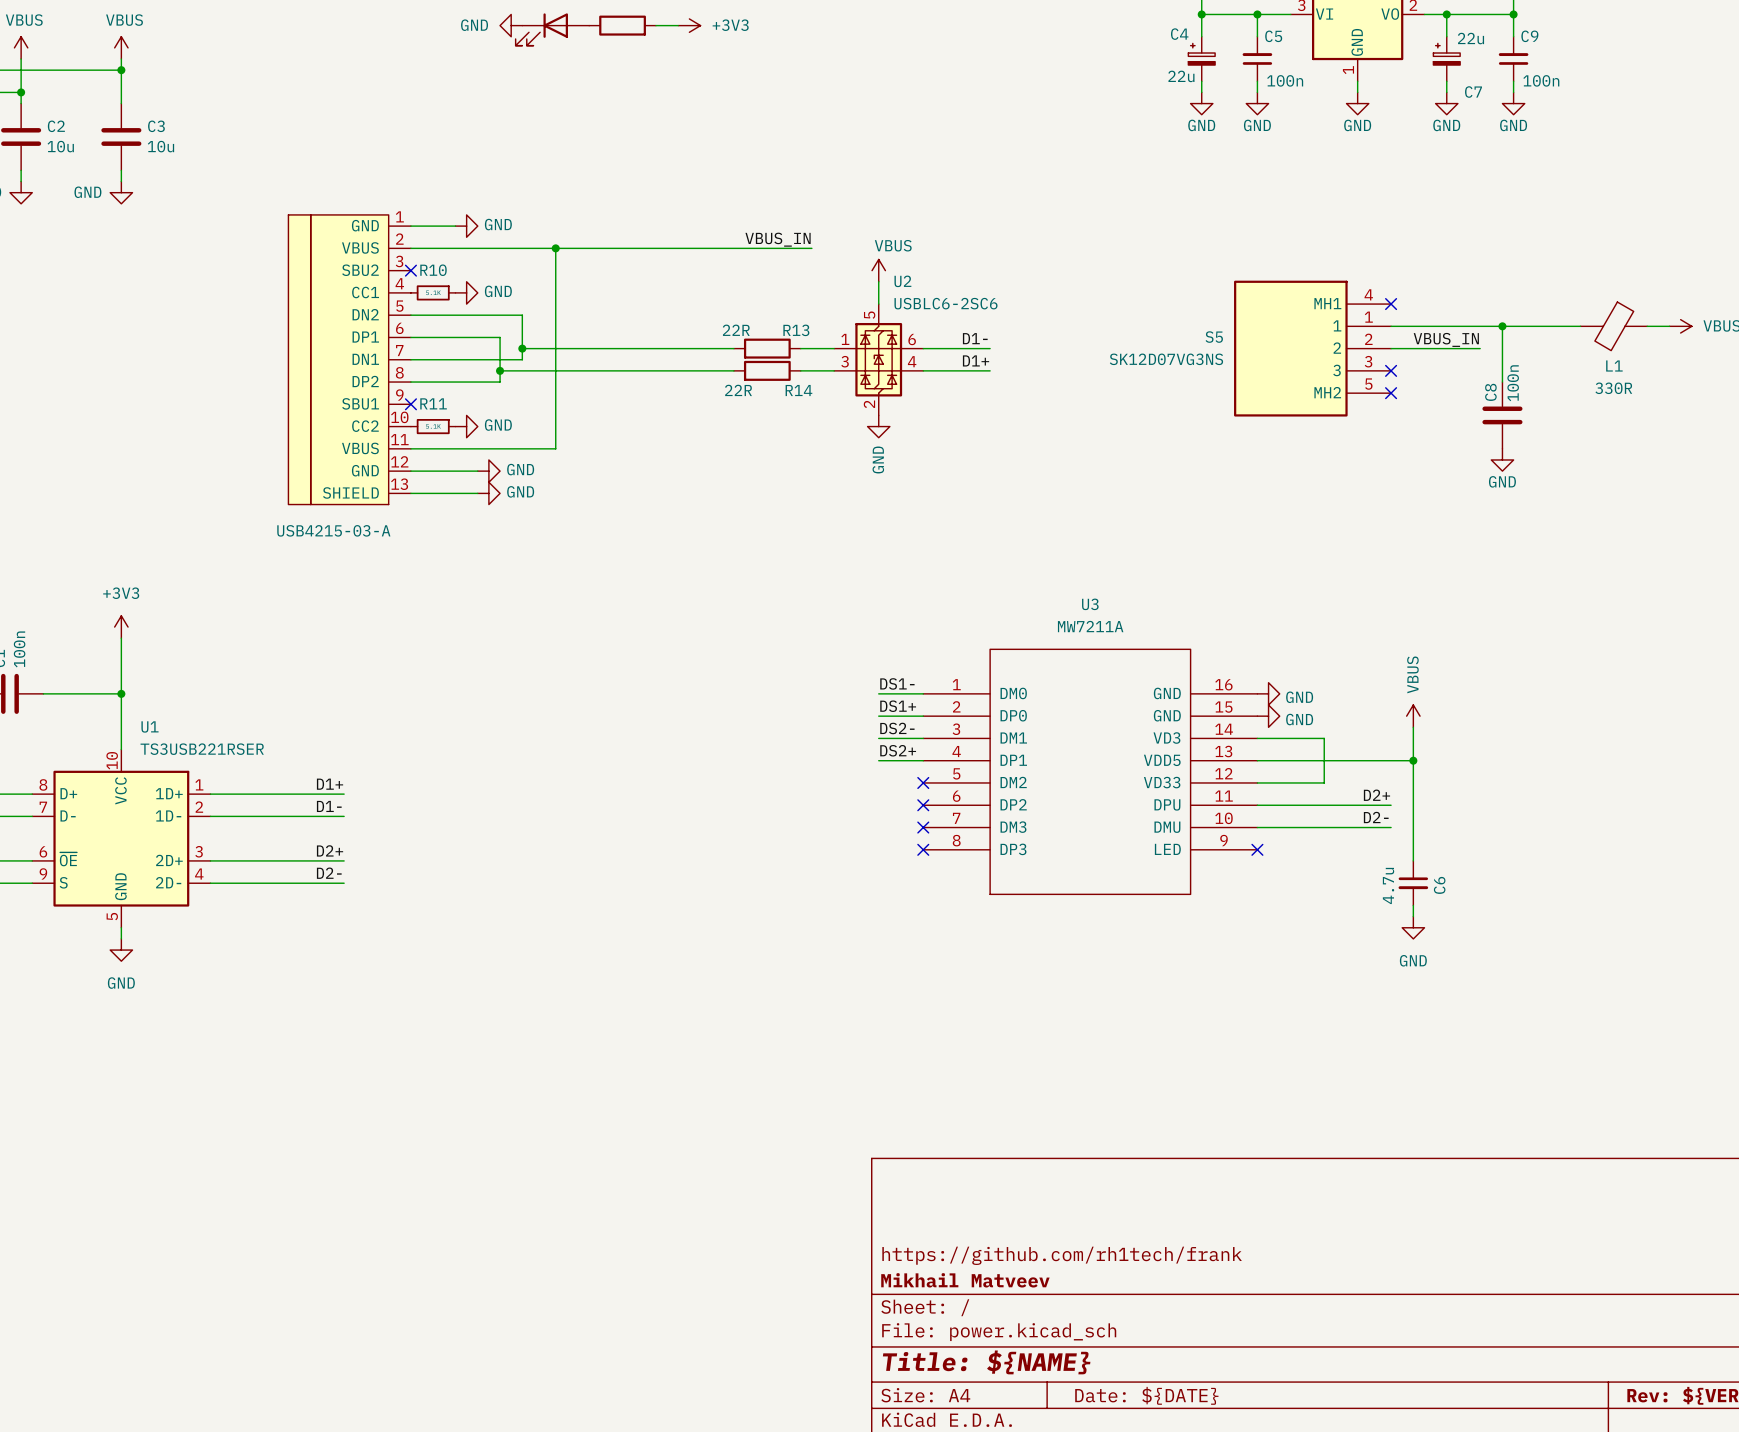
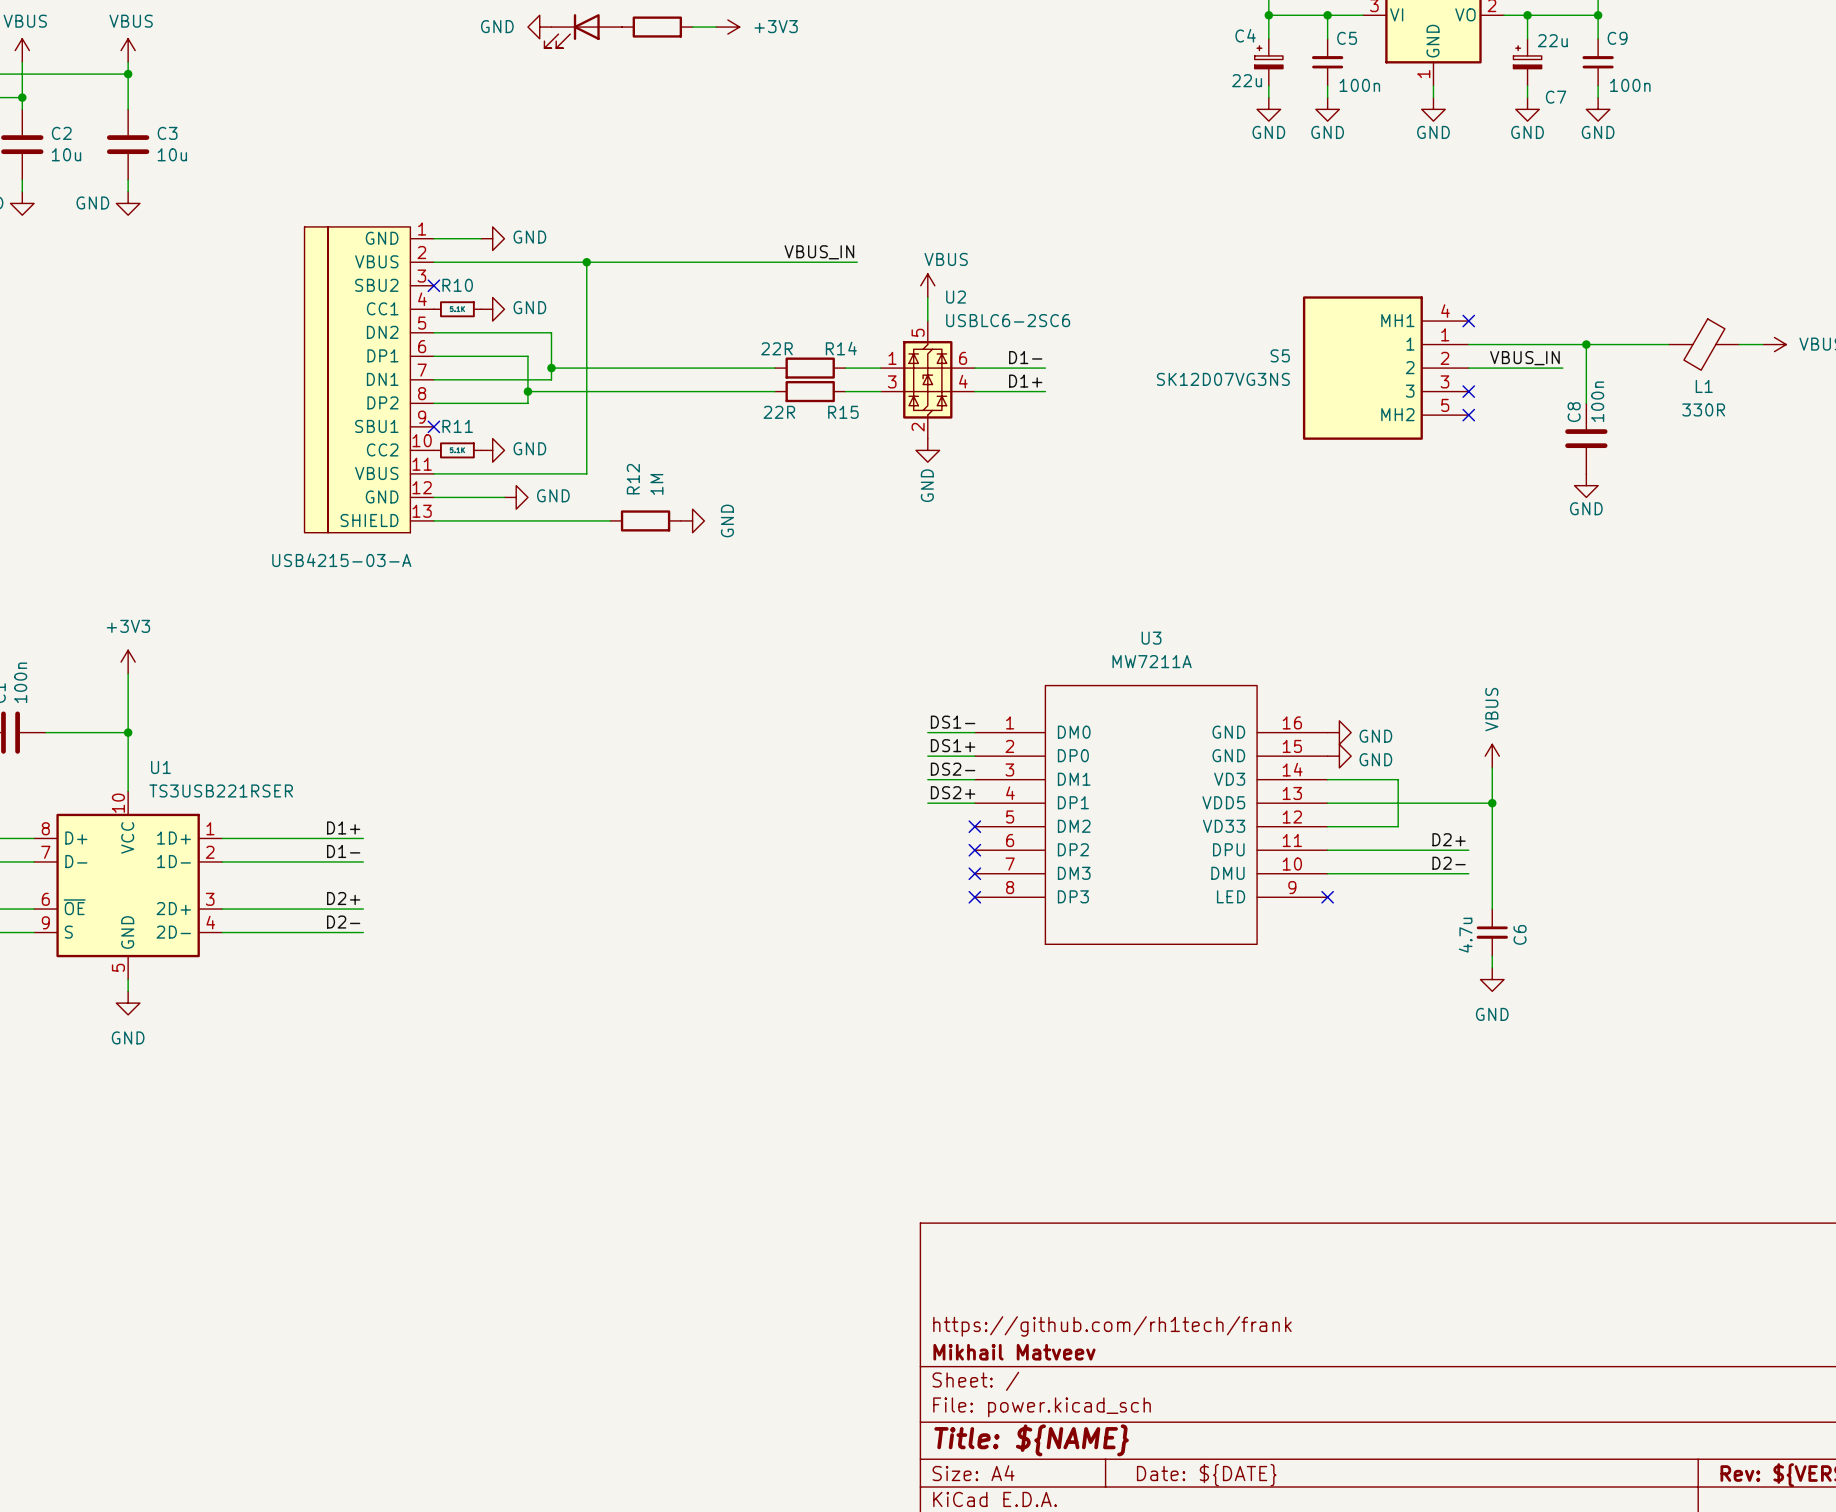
R13 name: R13 (796, 330) -> R14 (841, 348)
R14 name: R14 (798, 390) -> R15 (843, 412)
power symbol text rotation: 0° (520, 491) -> 90° counterclockwise (727, 520)
wire: none -> (504, 520) (610, 520)
power symbol position: GND (488, 493) -> GND (692, 520)
R12: none -> 1M (645, 520)

